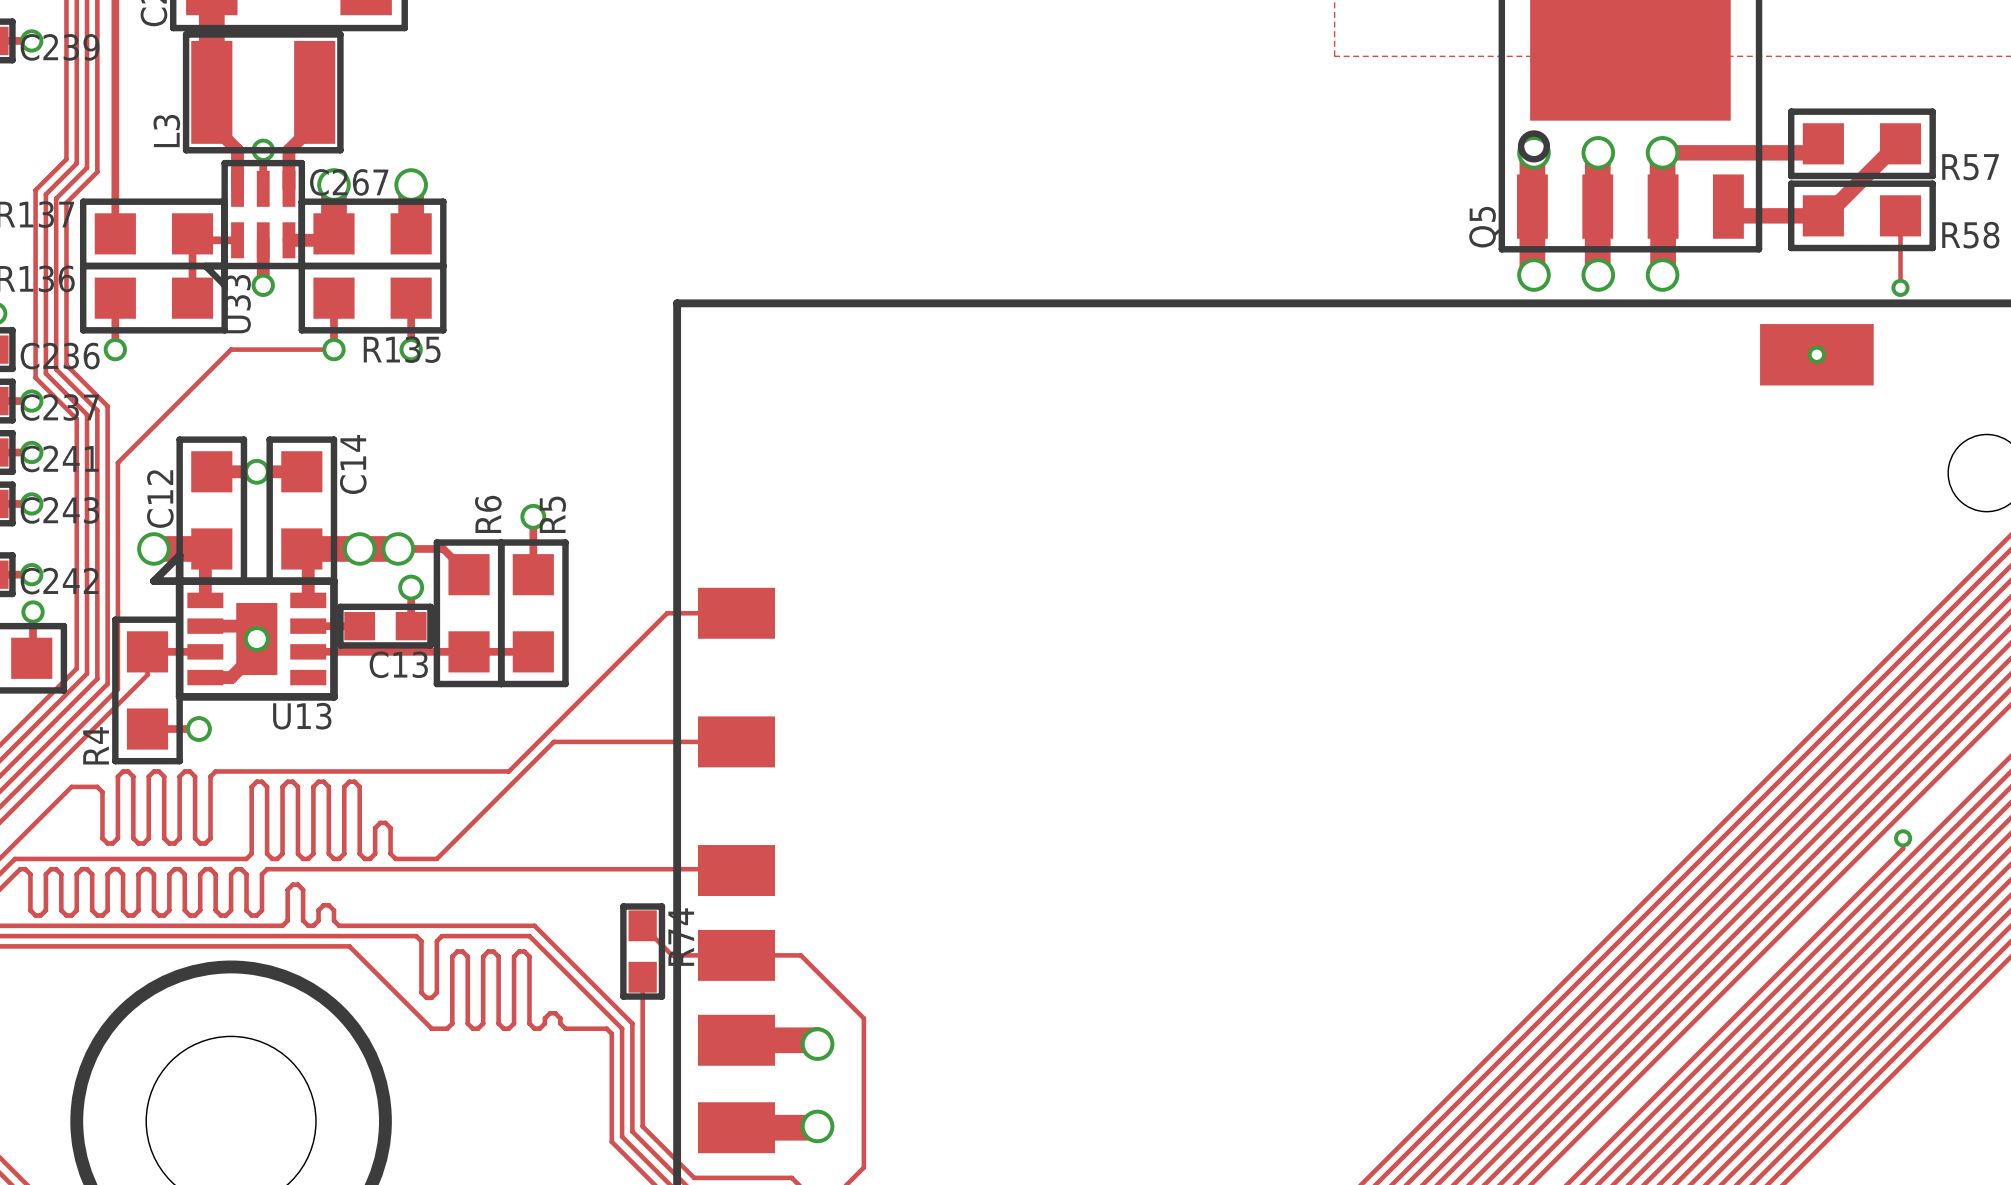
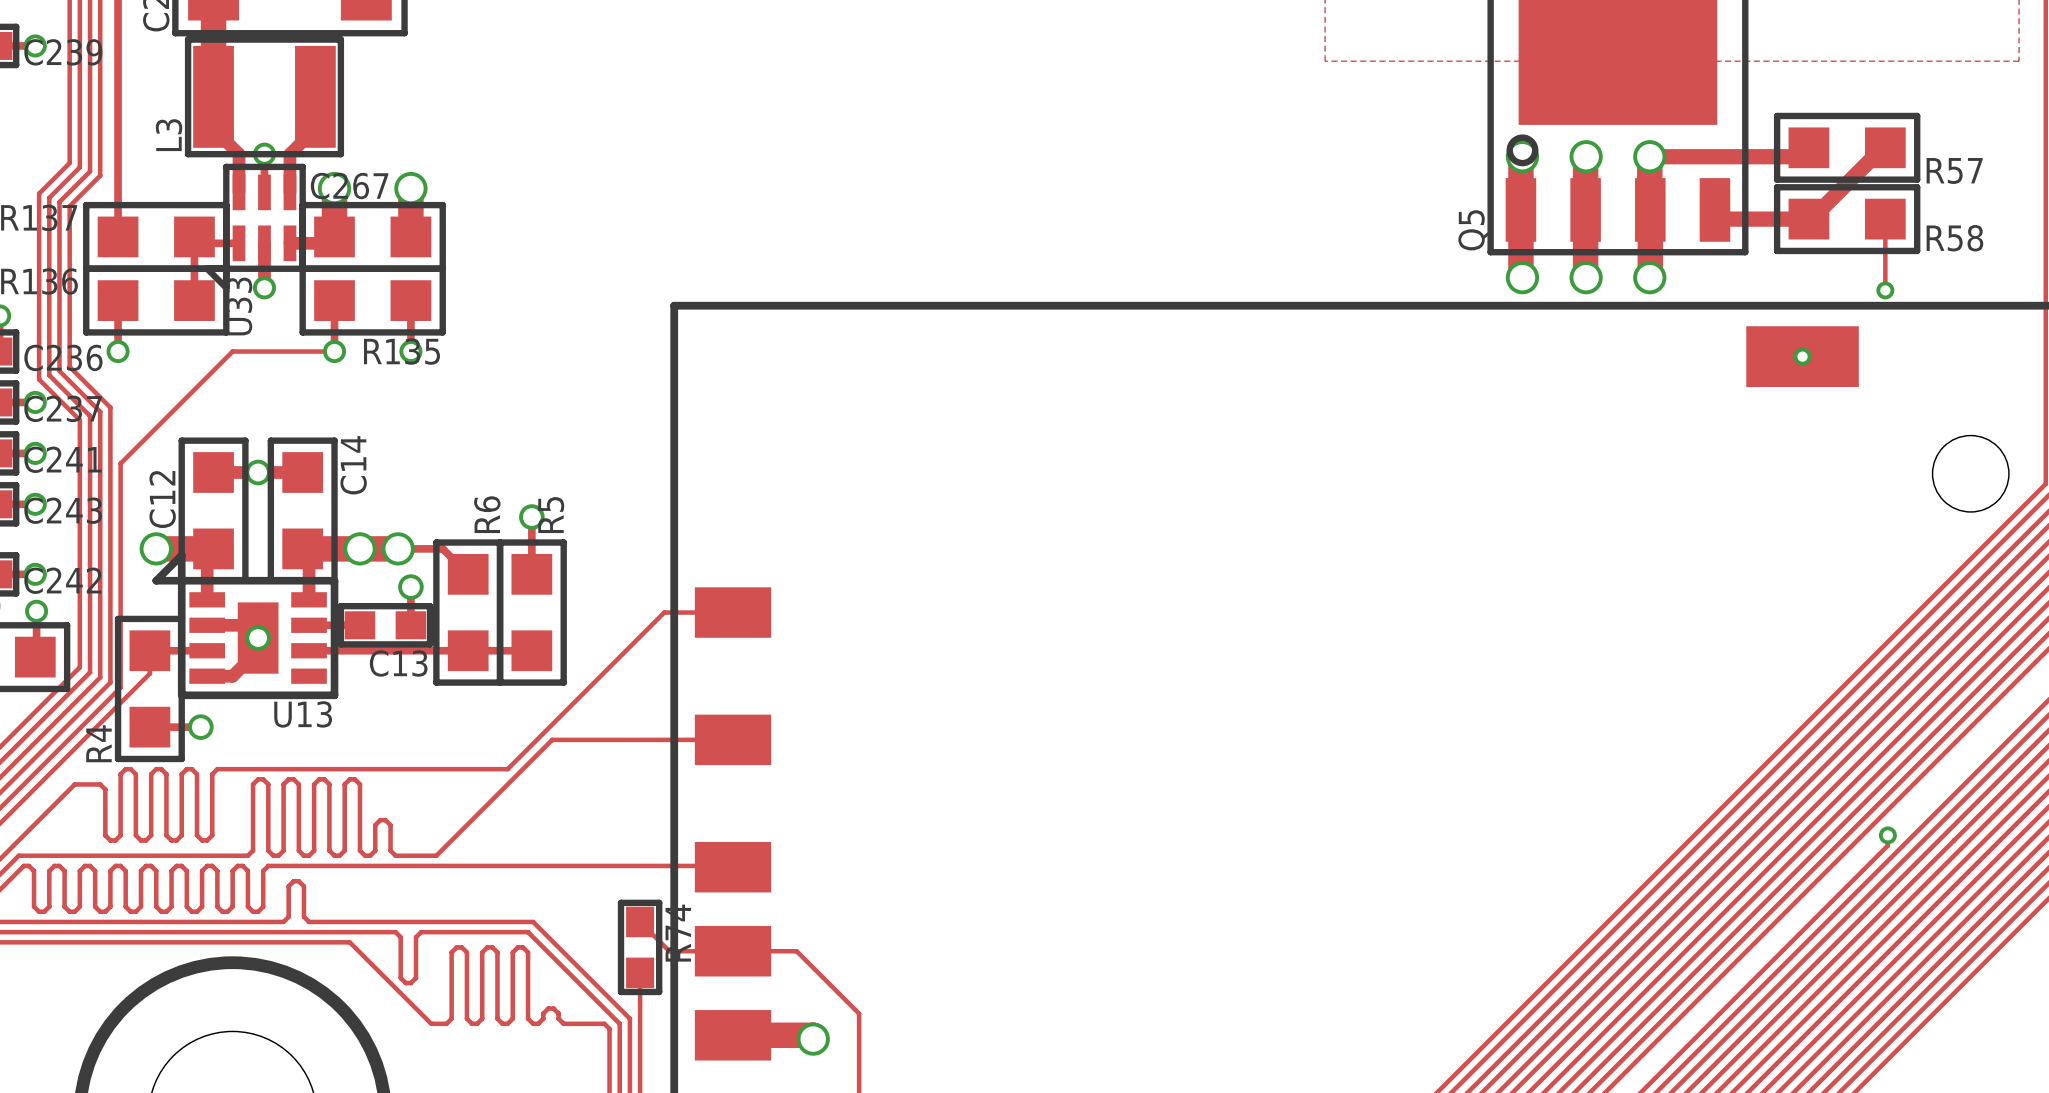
track: (313, 925) (318, 920) (318, 910) (323, 905) (328, 905) (333, 910) (333, 920) (339, 925) -> (314, 921) (339, 921)
track: (395, 936) (416, 936) (421, 941) (421, 992) (426, 997) (431, 997) (436, 992) (436, 941) (442, 936) -> (395, 932) (400, 937) (400, 977) (405, 983) (410, 983) (416, 977) (416, 937) (421, 932) (441, 932)

